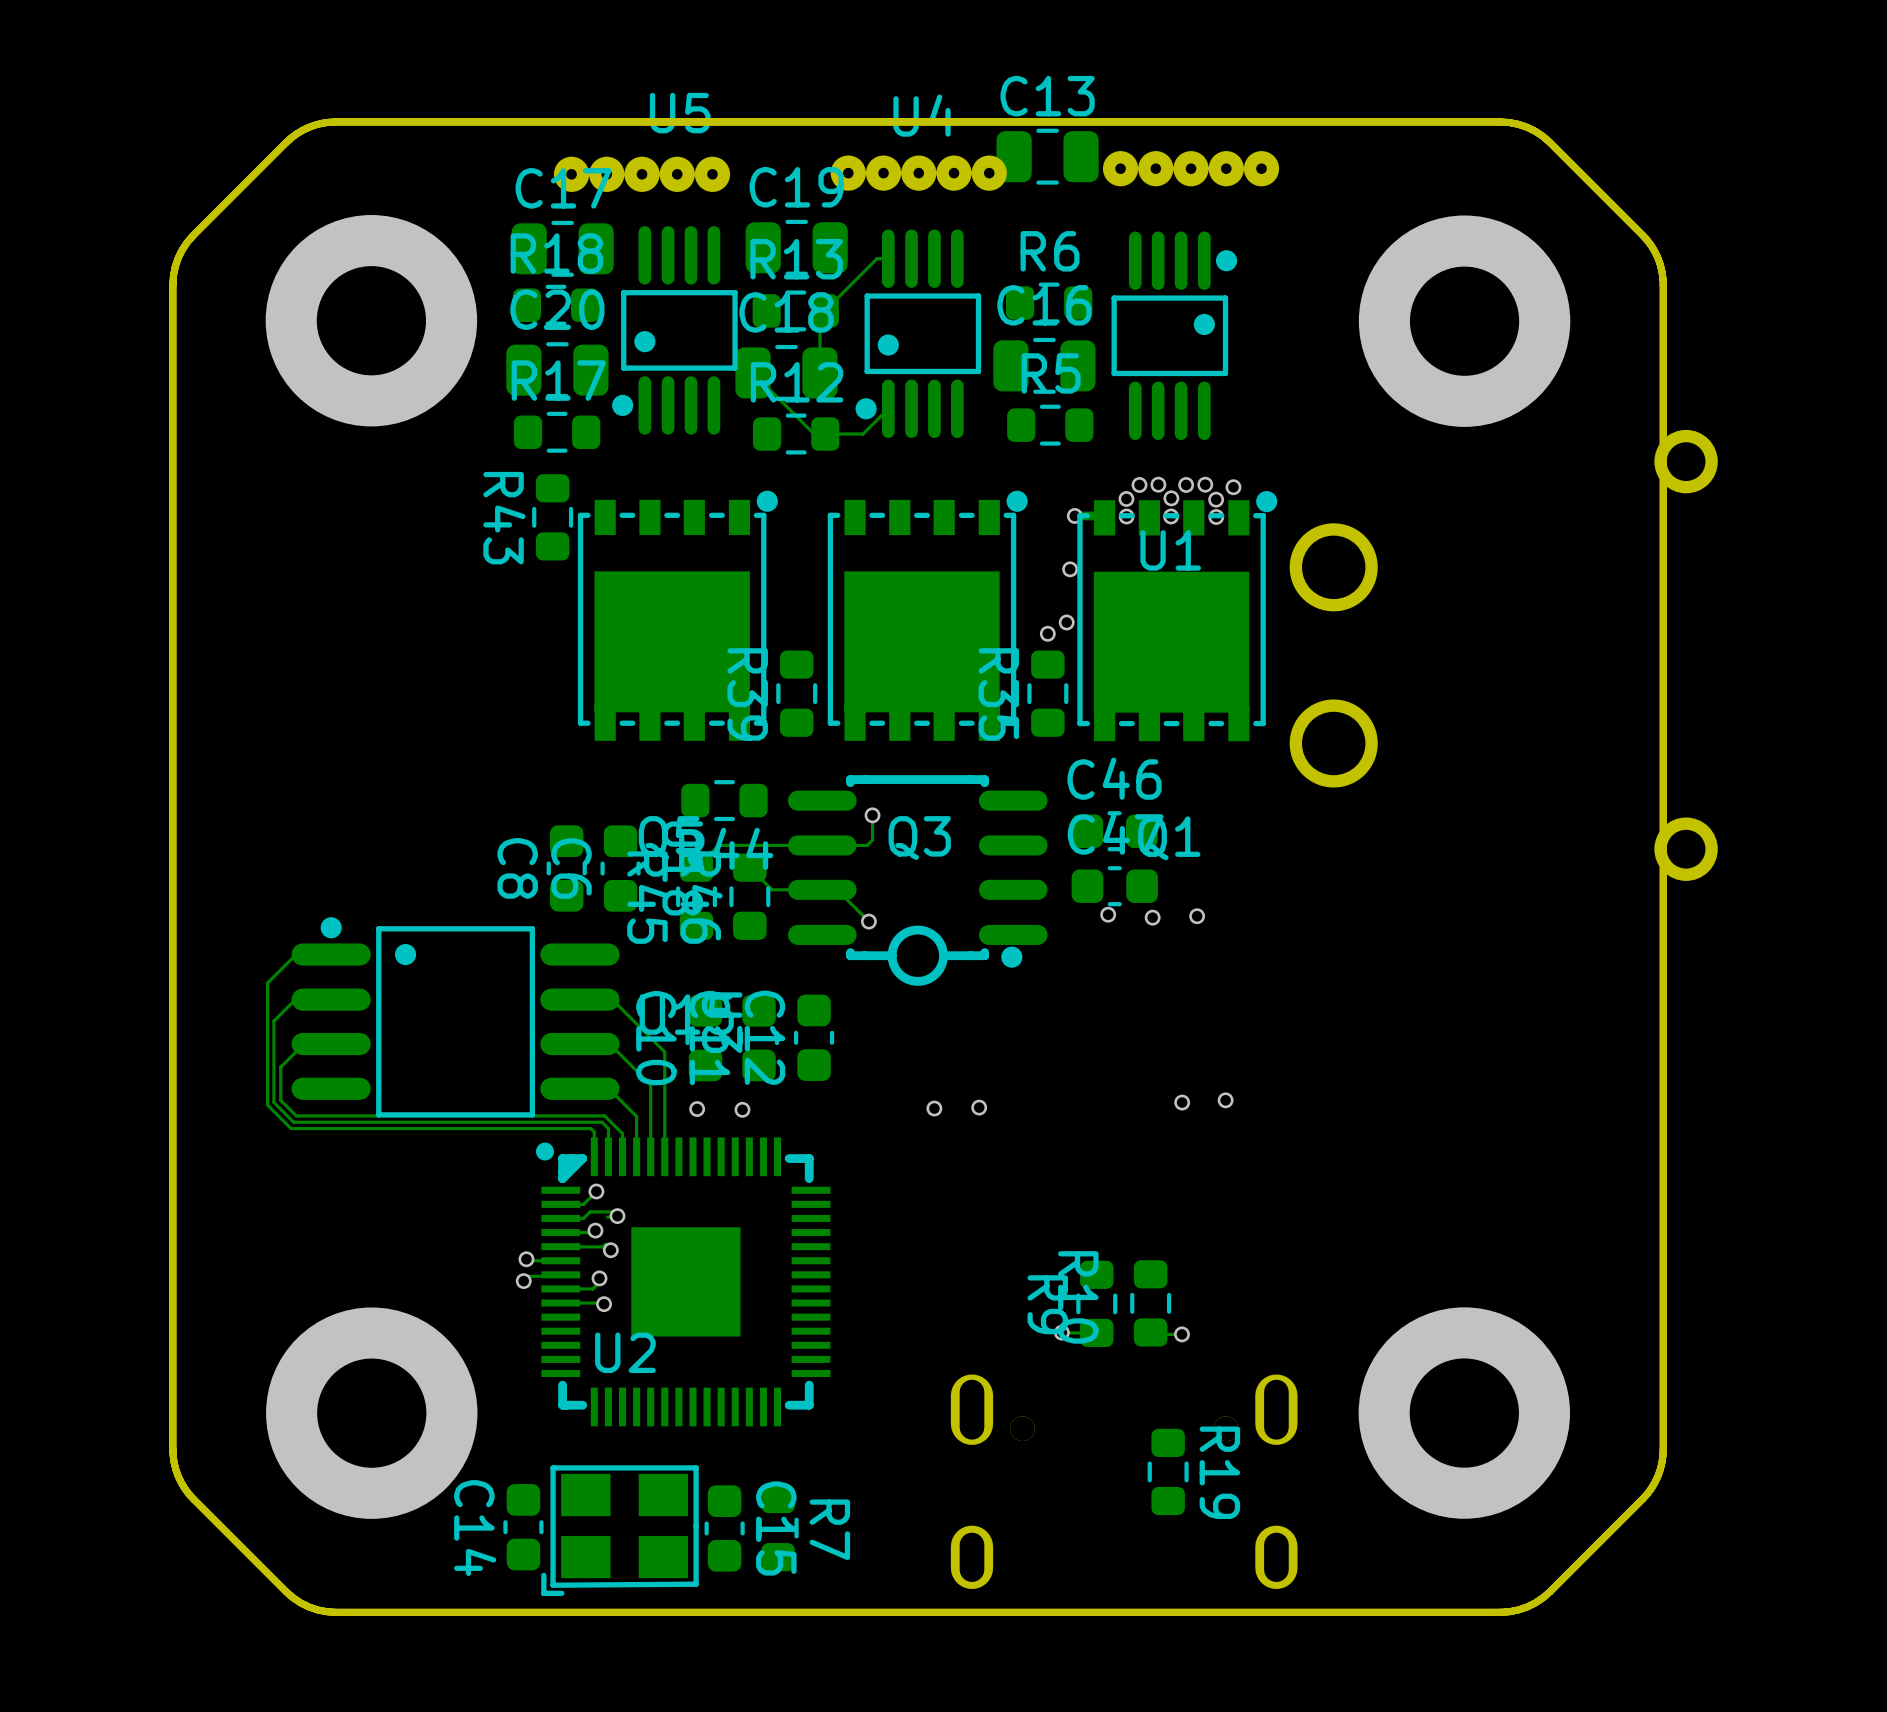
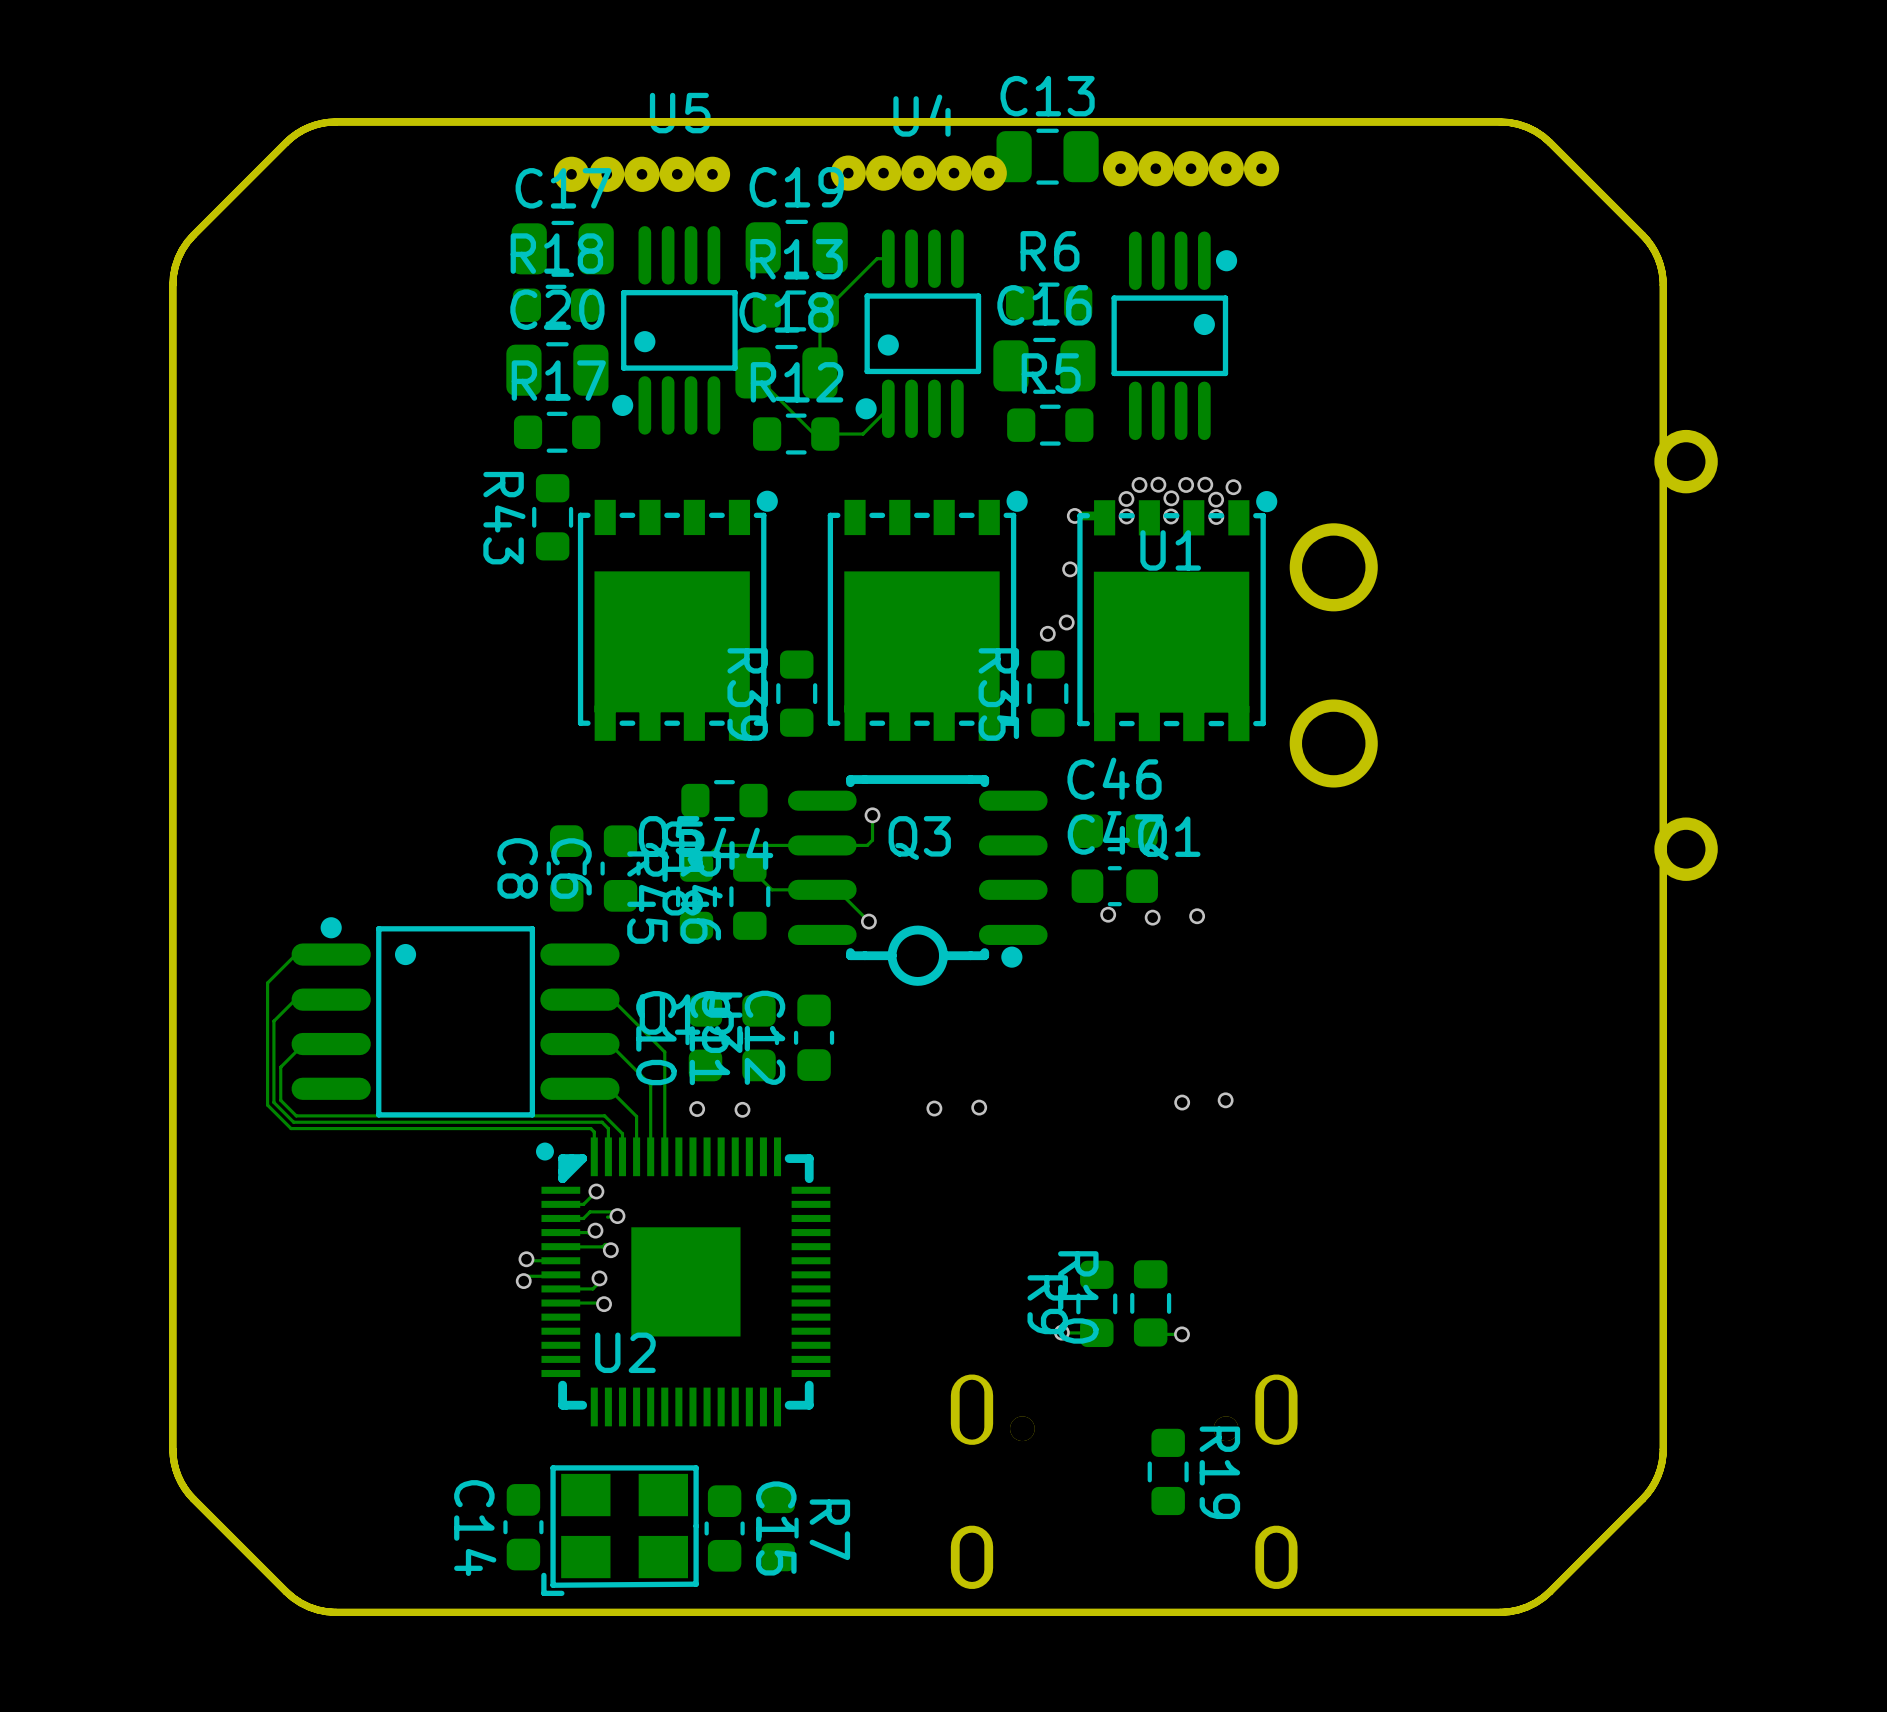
via: (371, 320) -> none
via: (1464, 321) -> none
via: (371, 1413) -> none
via: (1464, 1413) -> none

